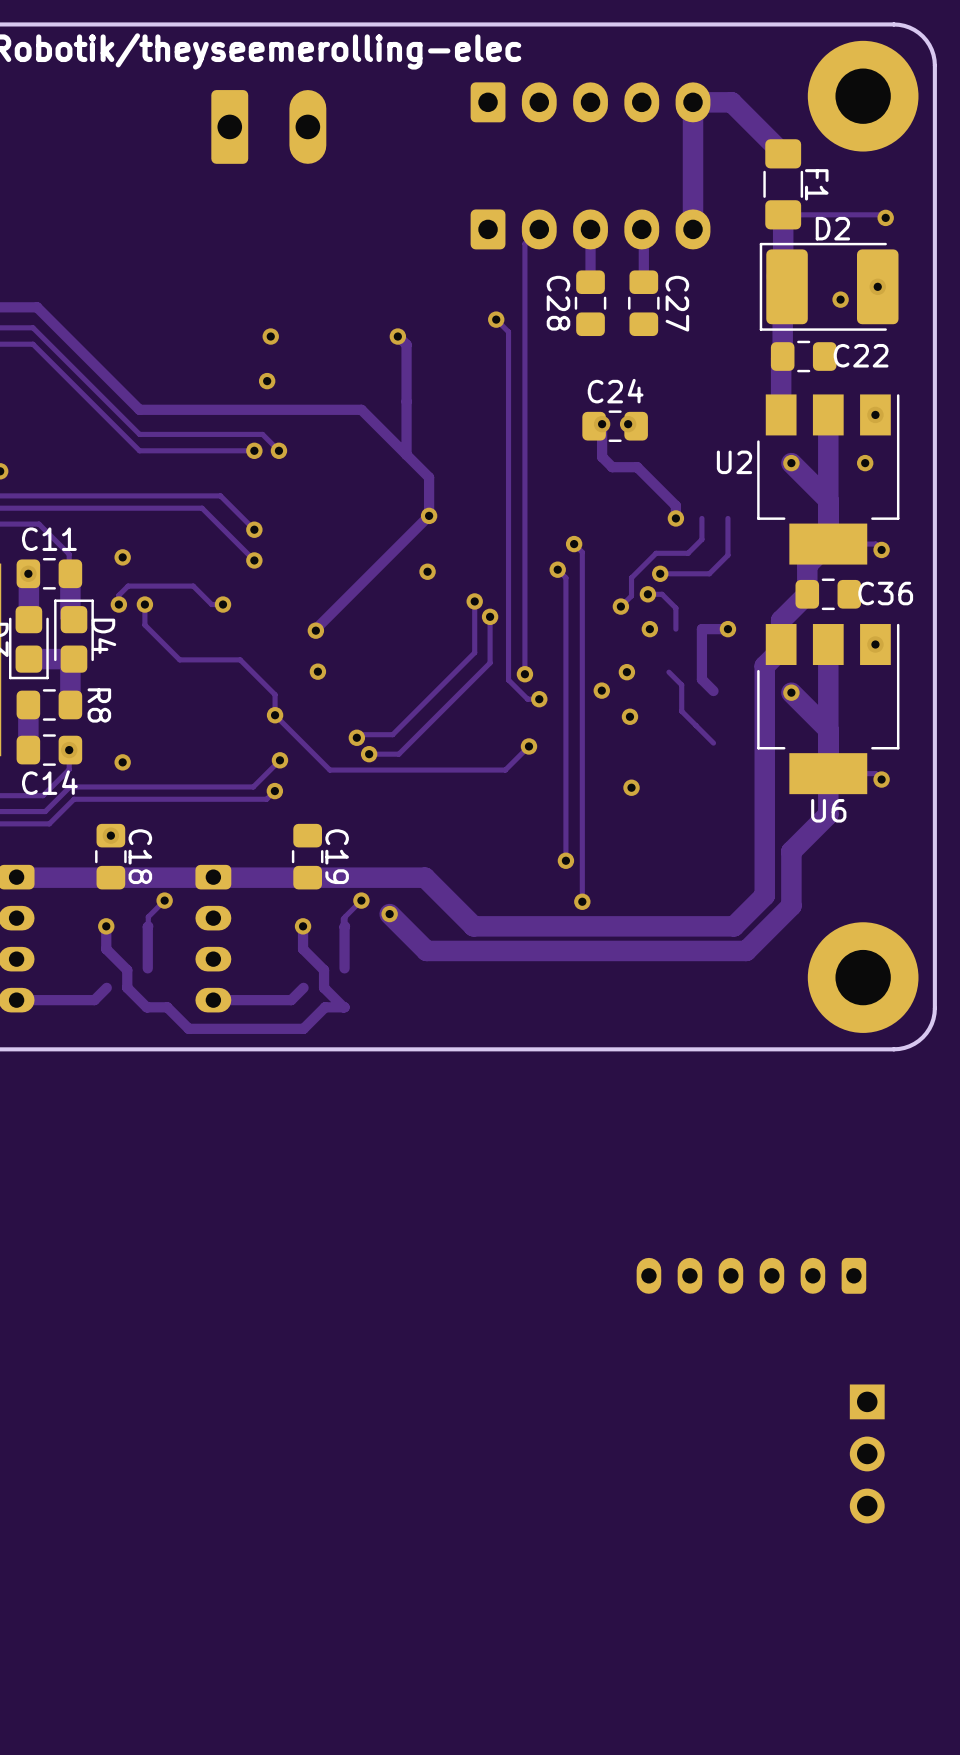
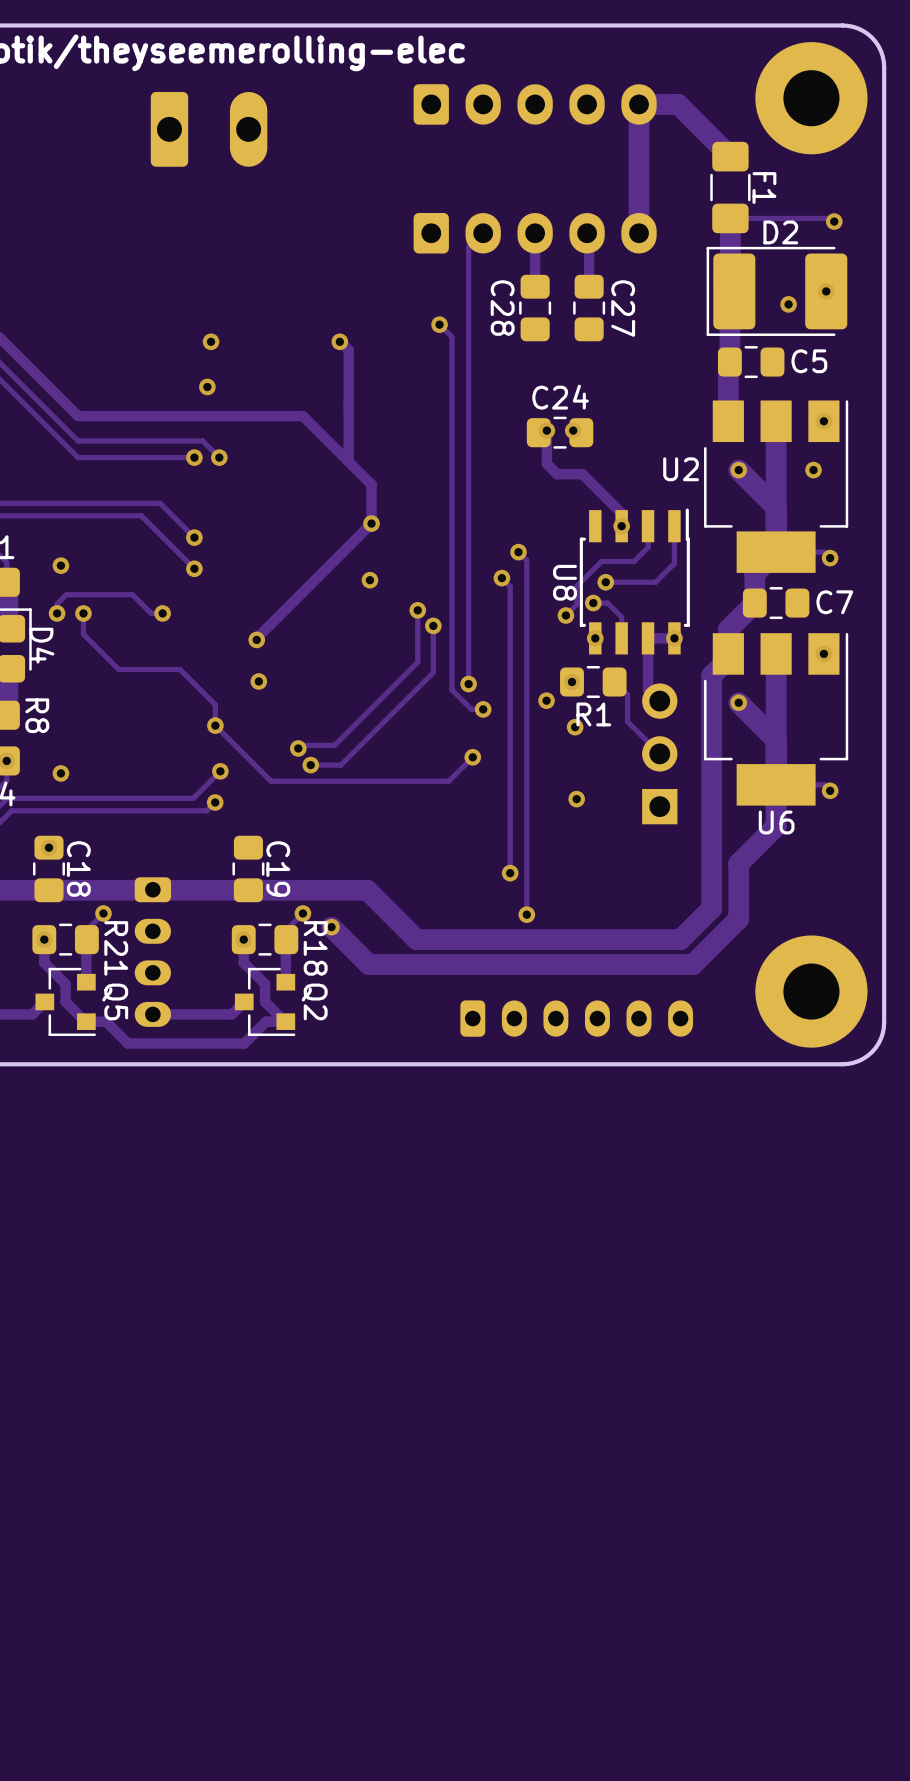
C22 name: C22 (861, 355) -> C5 (809, 361)
U8: none -> (634, 581)
C36 name: C36 (885, 593) -> C7 (834, 602)
R1: none -> (593, 681)
part: none -> (659, 753)
R21: none -> (65, 939)
R18: none -> (265, 939)
Q5: none -> (65, 1001)
Q2: none -> (265, 1001)
part rotation: 0° (751, 1275) -> 180° (576, 1018)
part position: (751, 1275) -> (576, 1018)
part: (867, 1453) -> none

